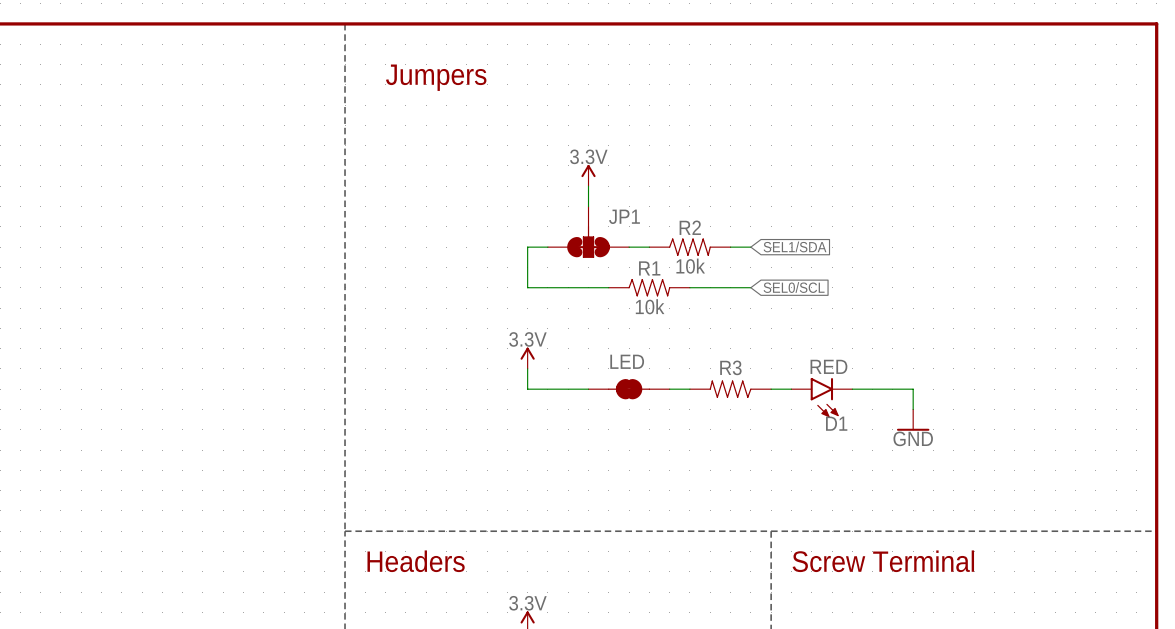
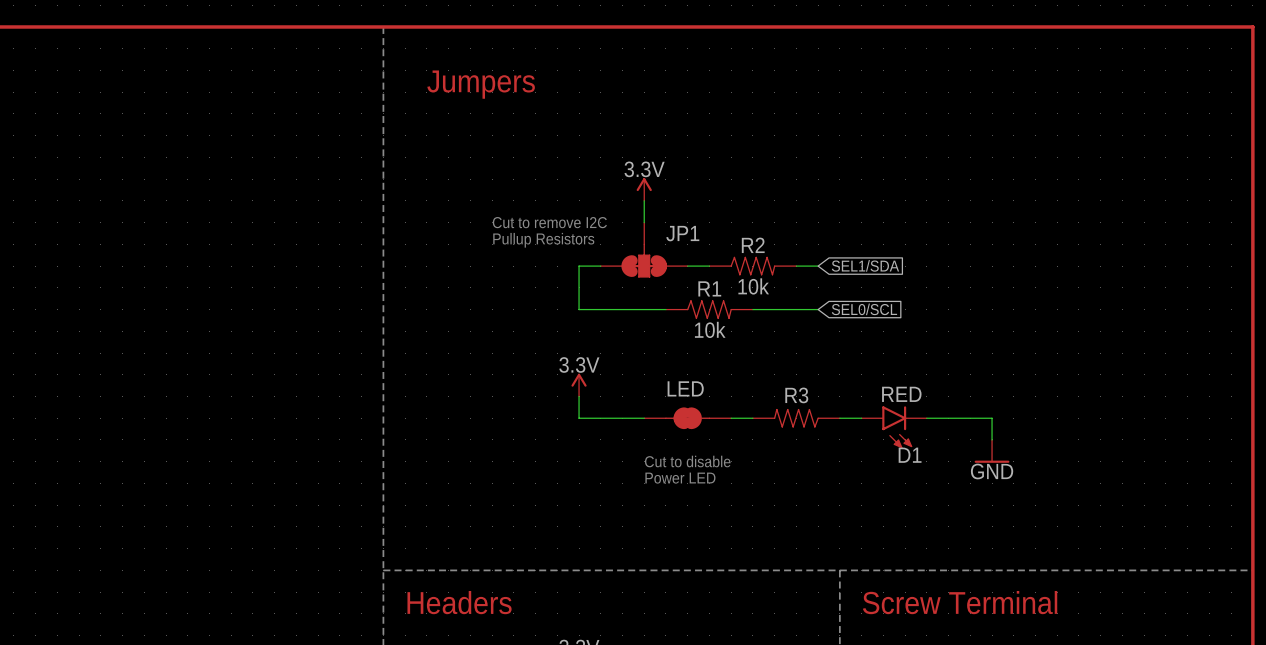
text: none -> Cut to remove I2C (549, 222)
text: none -> Pullup Resistors (543, 240)
text: none -> Cut to disable (687, 461)
text: none -> Power LED (680, 478)

